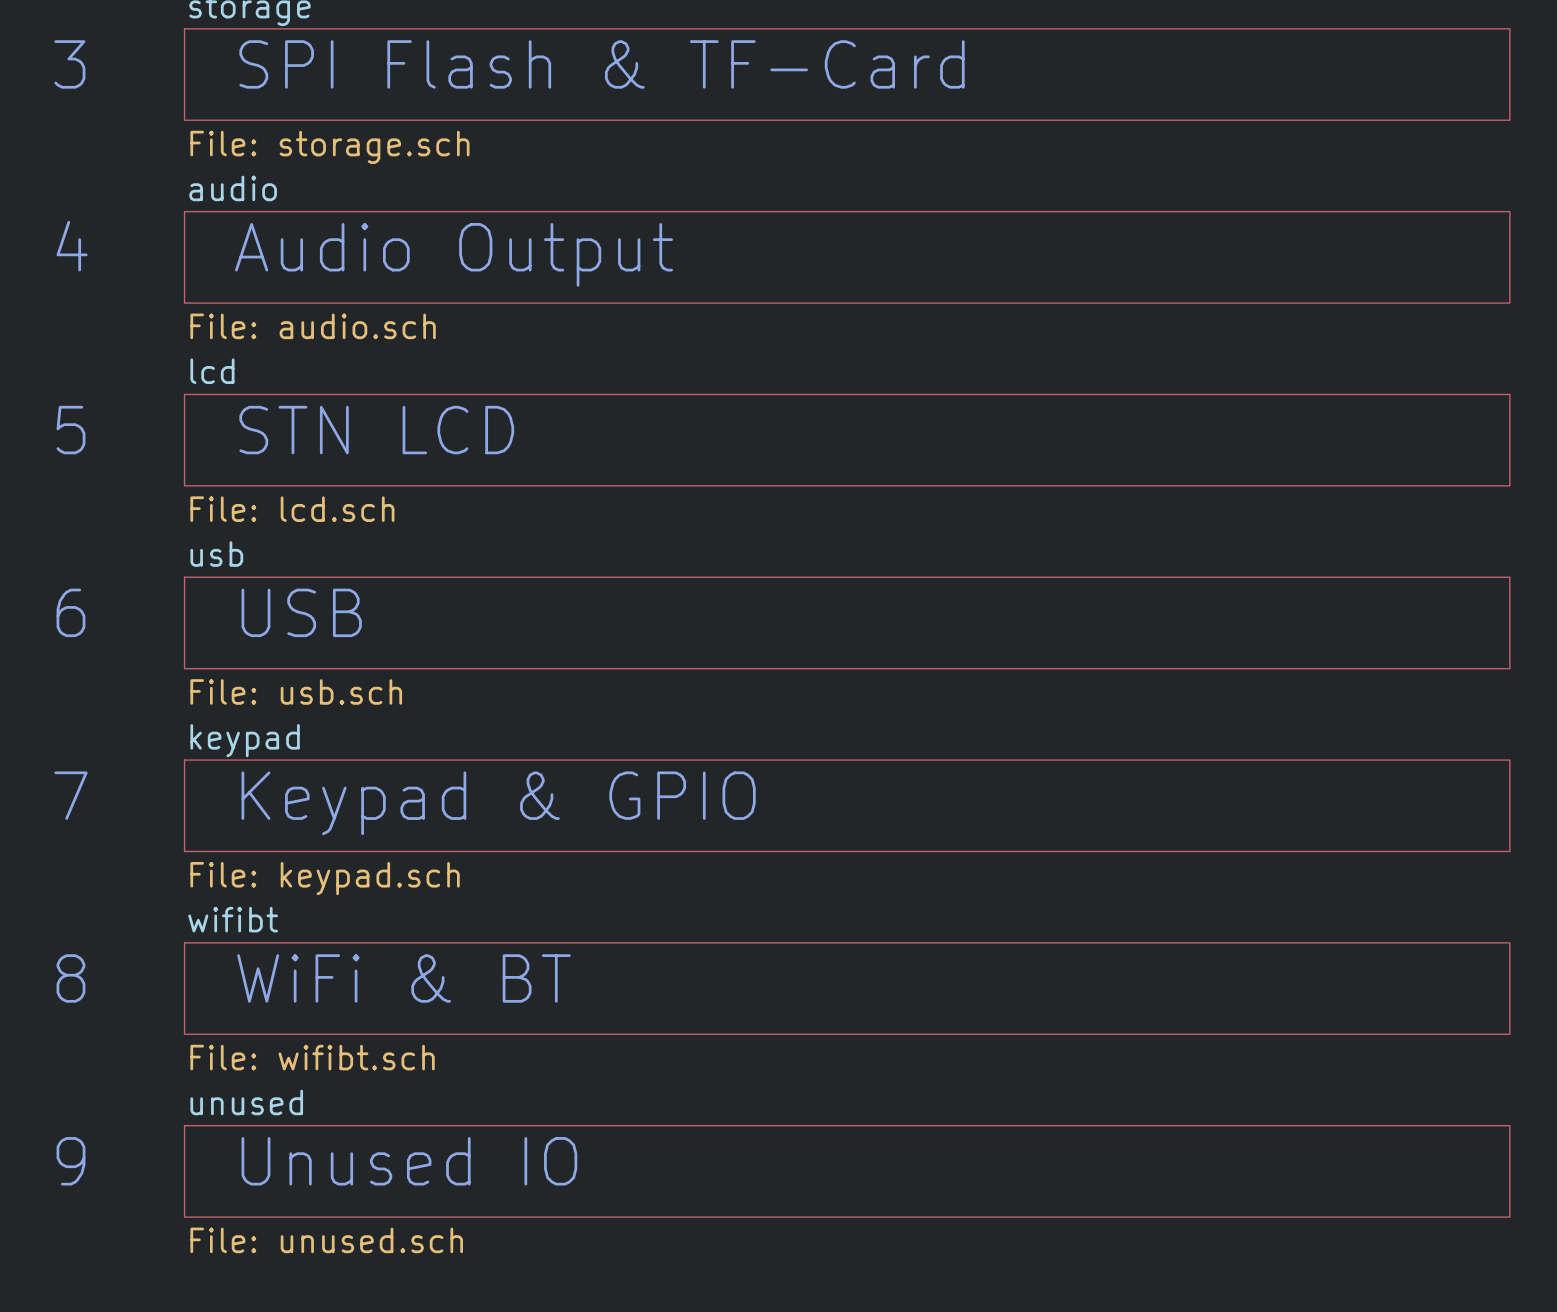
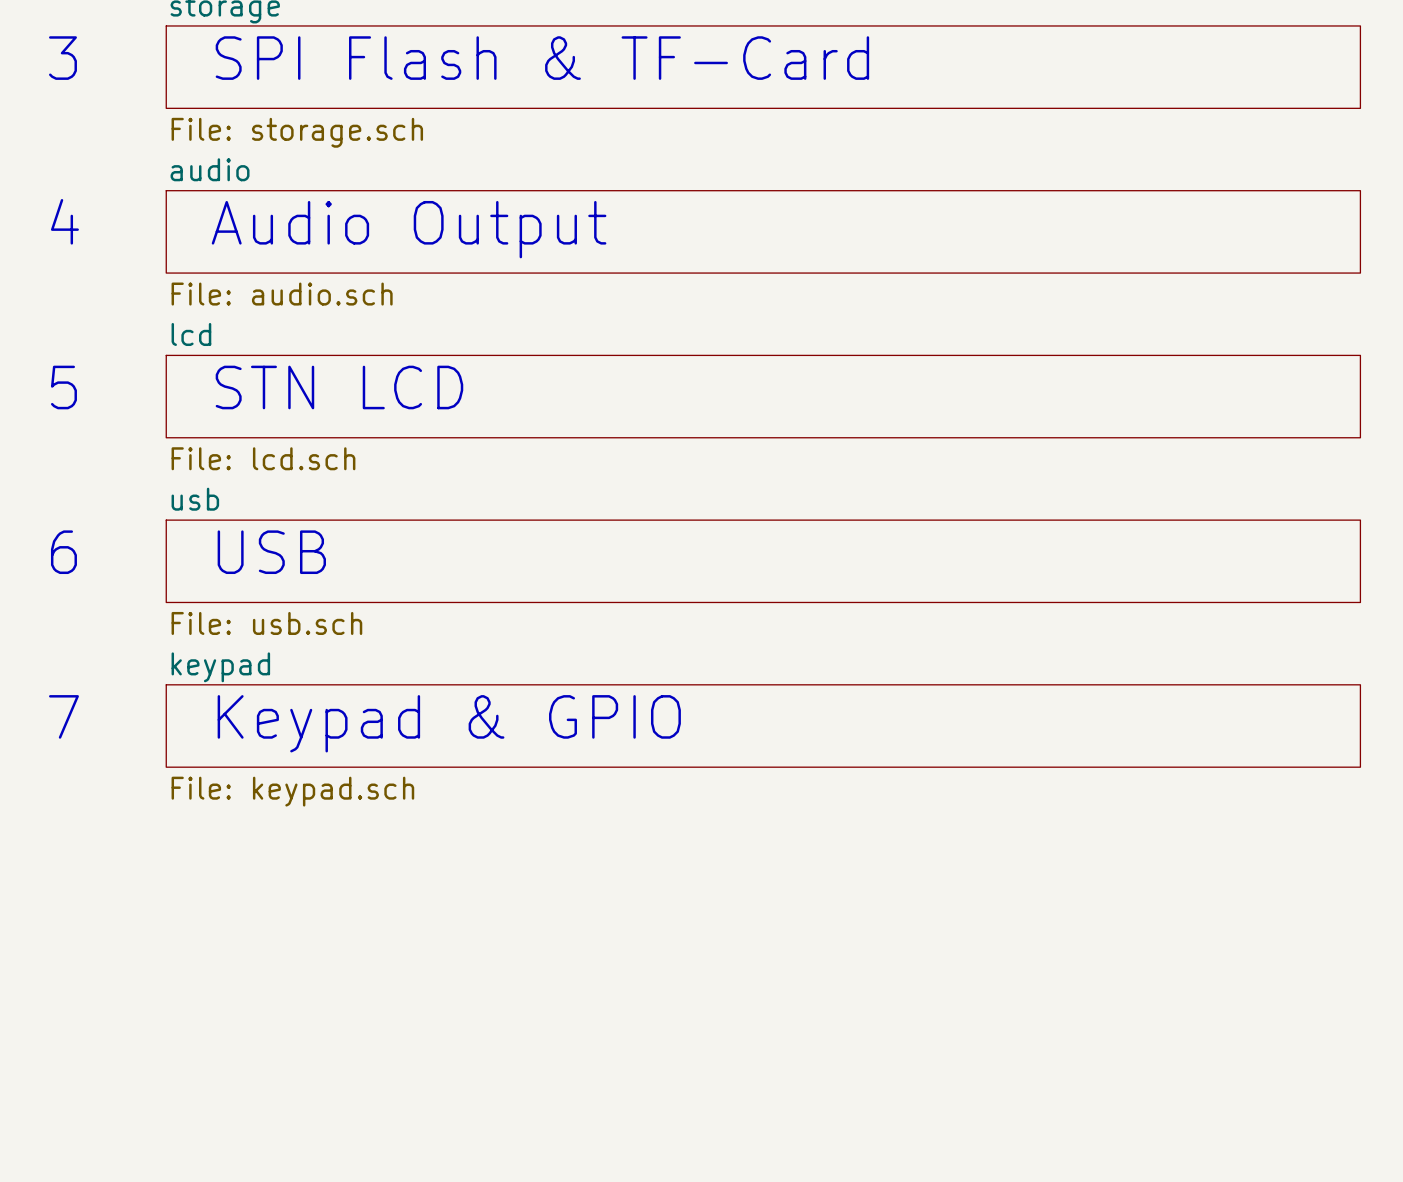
text: 8 (70, 978) -> none
text: WiFi & BT (403, 978) -> none
sheet wifibt: File: wifibt.sch (847, 988) -> none
text: 9 (70, 1161) -> none
text: Unused IO (409, 1161) -> none
sheet unused: File: unused.sch (847, 1171) -> none

